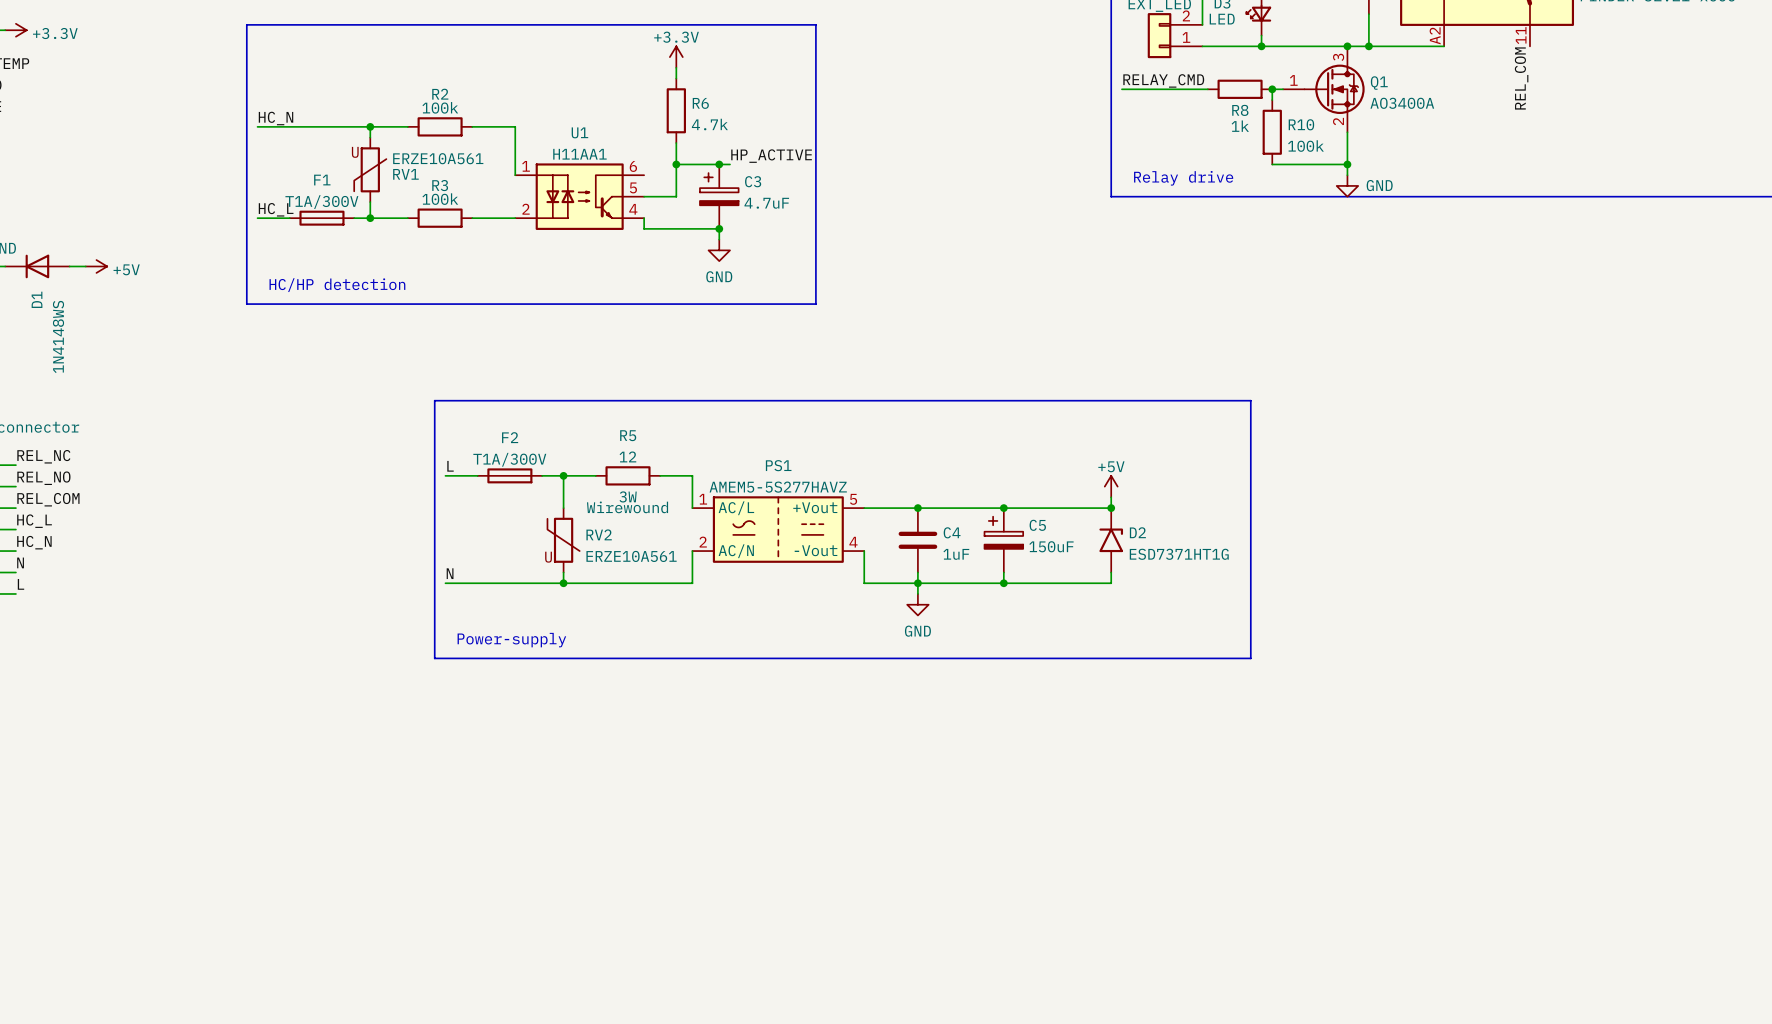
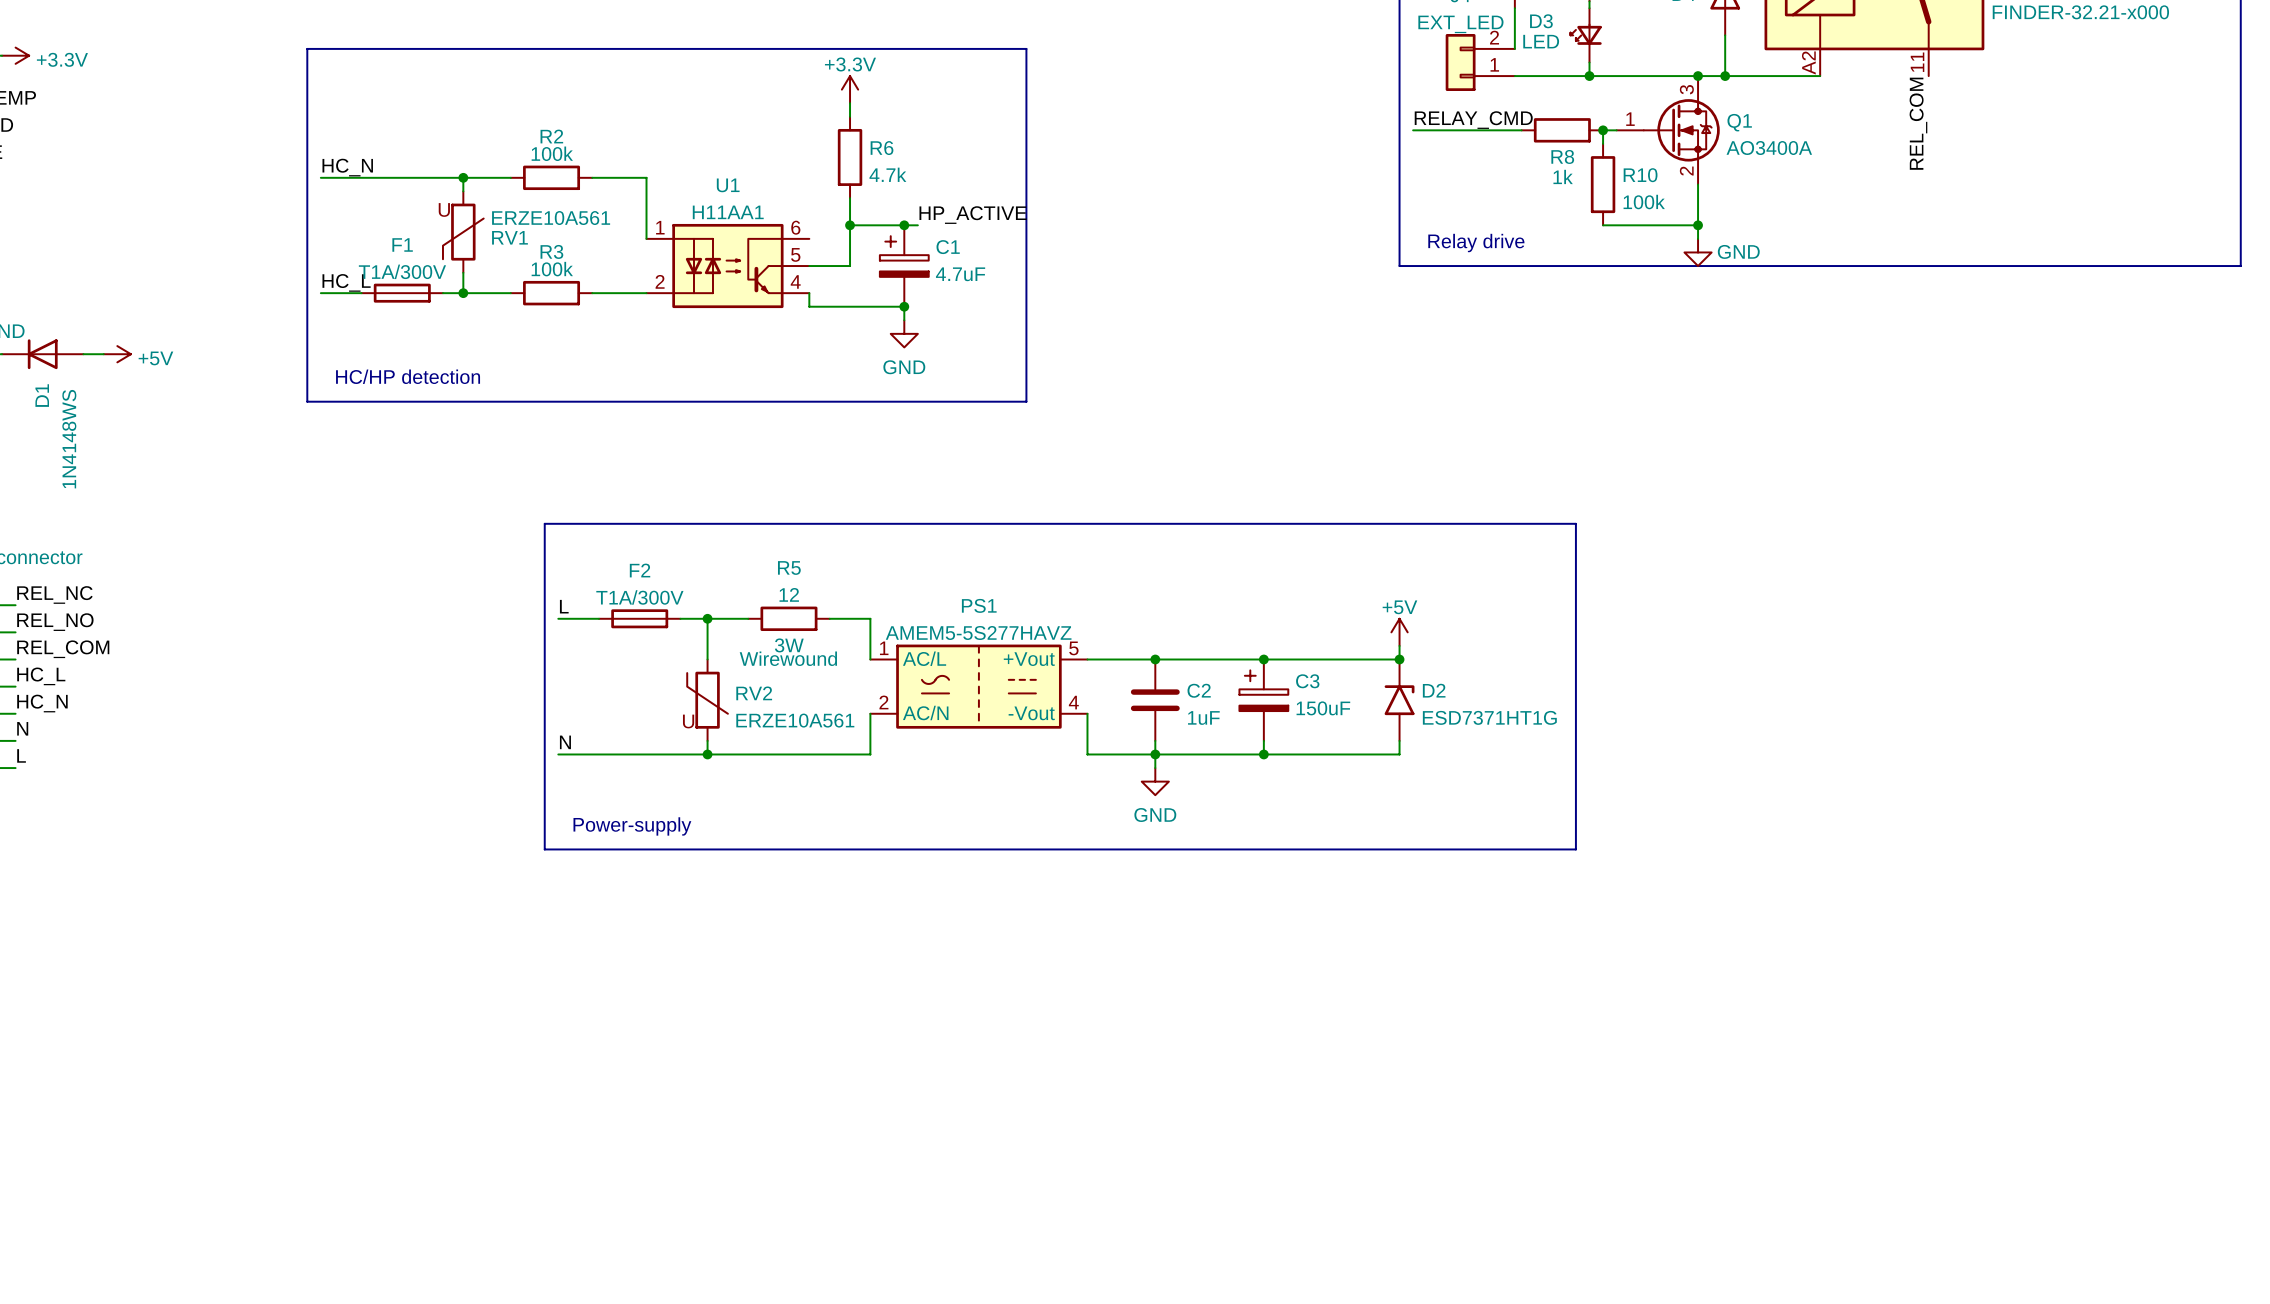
C3 name: C3 (753, 181) -> C1 (948, 247)
C5 name: C5 (1037, 525) -> C3 (1307, 681)
C4 name: C4 (952, 532) -> C2 (1199, 690)

